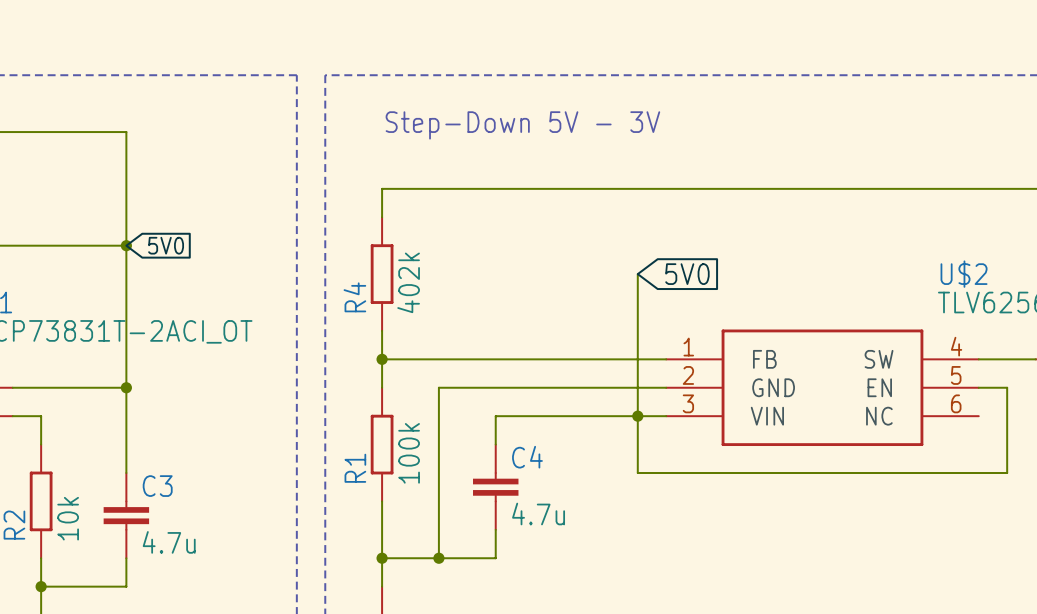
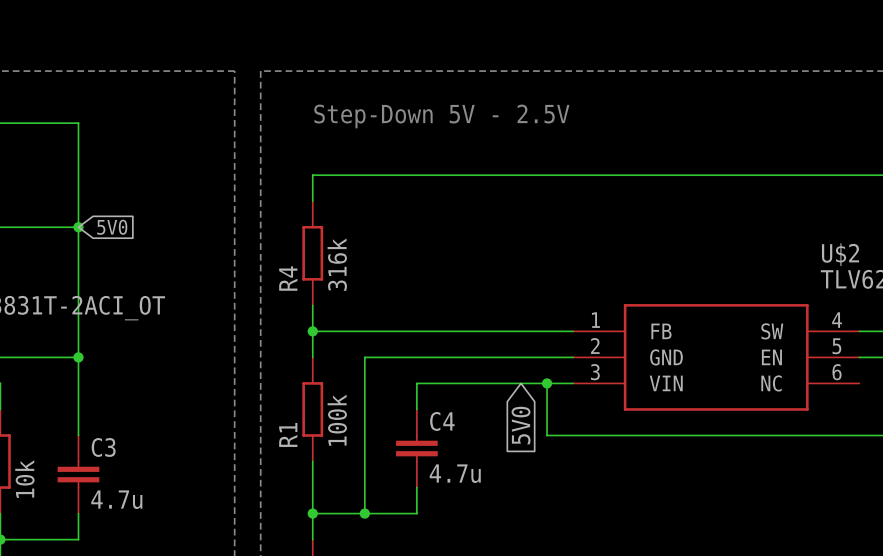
text: Step-Down 5V - 3V (522, 125) -> Step-Down 5V - 2.5V (441, 116)
wire: (637, 274) (637, 416) -> none
global label rotation: 0° (687, 274) -> 90° clockwise (521, 425)
global label position: 5V0 (687, 274) -> 5V0 (521, 425)
R4 value: 402k (408, 282) -> 316k (337, 264)

